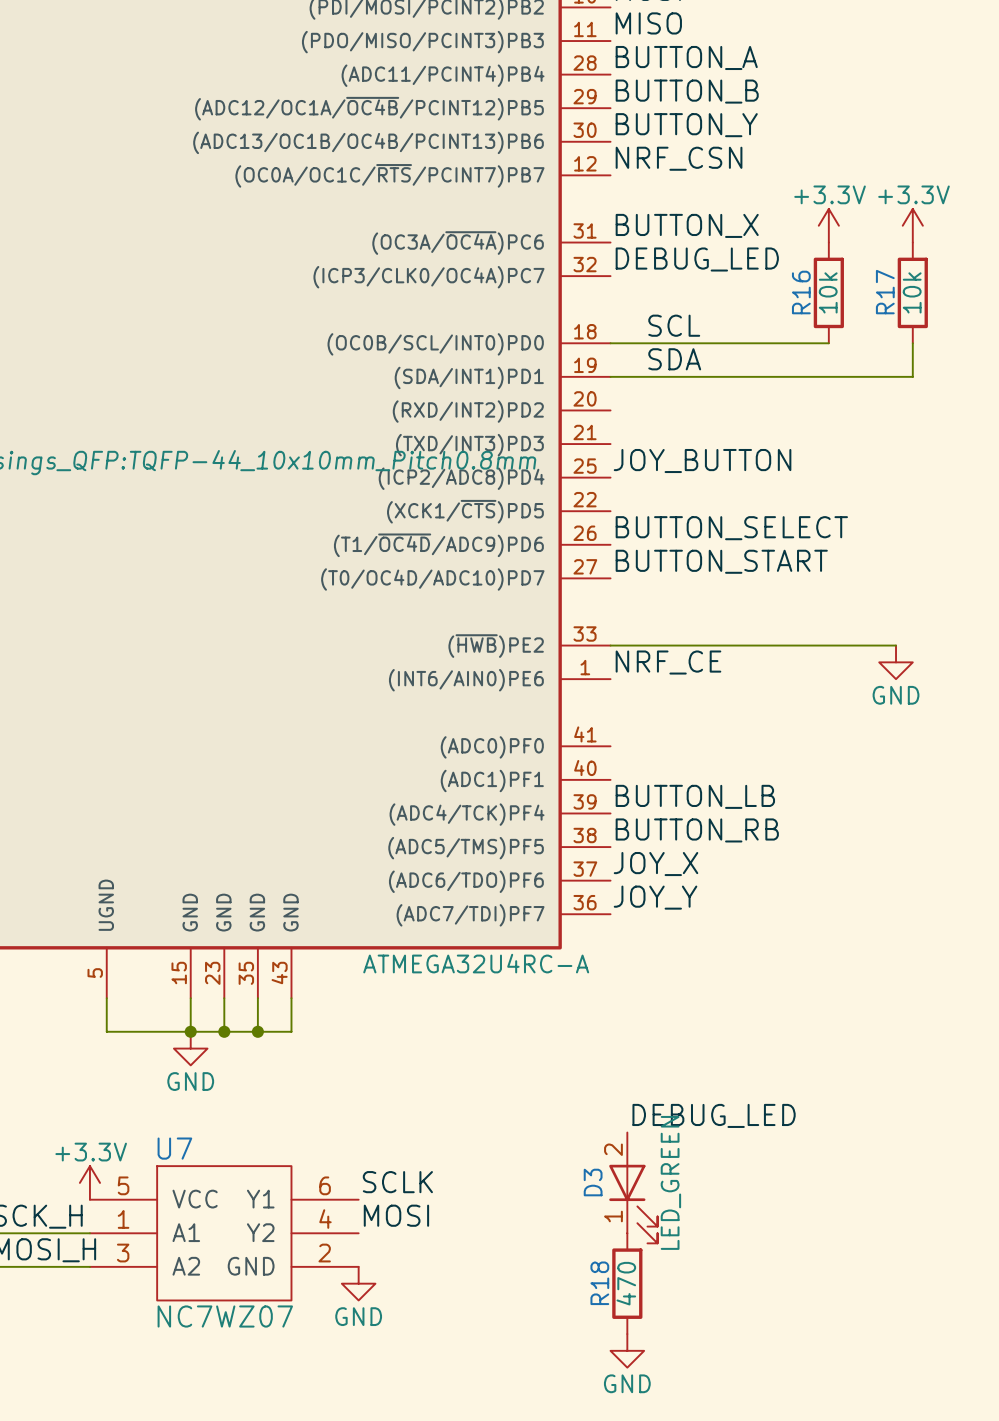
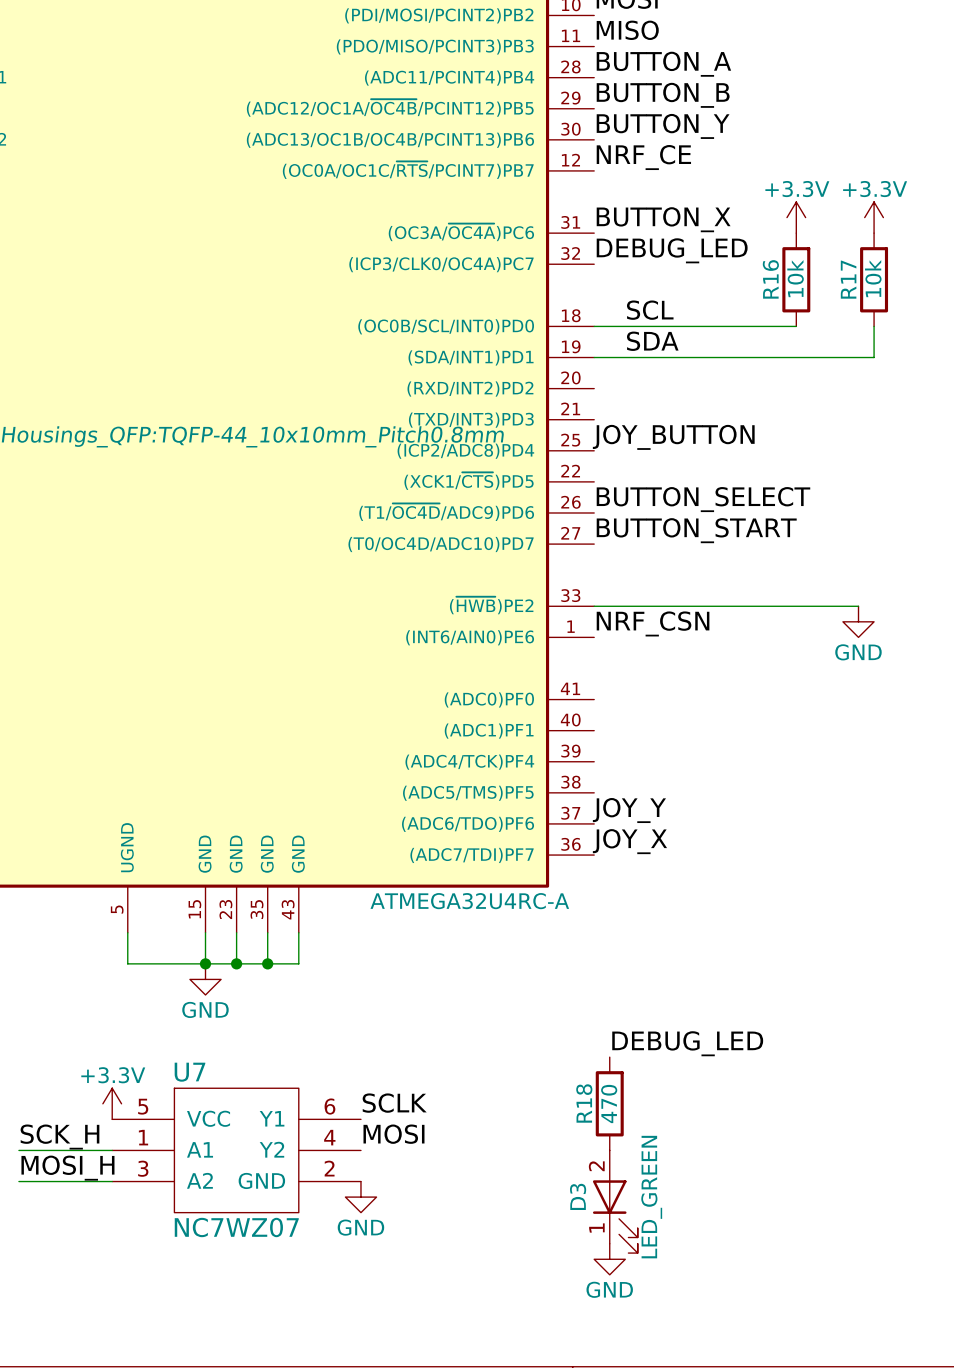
label: NRF_CSN (679, 158) -> NRF_CE (643, 157)
label: NRF_CE (668, 662) -> NRF_CSN (653, 623)
label: BUTTON_LB (695, 796) -> none
label: BUTTON_RB (697, 830) -> none
label: JOY_X (656, 864) -> JOY_Y (629, 810)
label: JOY_Y (655, 897) -> JOY_X (629, 841)
D3 position: (633, 1187) -> (615, 1201)
R18 position: (627, 1283) -> (609, 1103)

